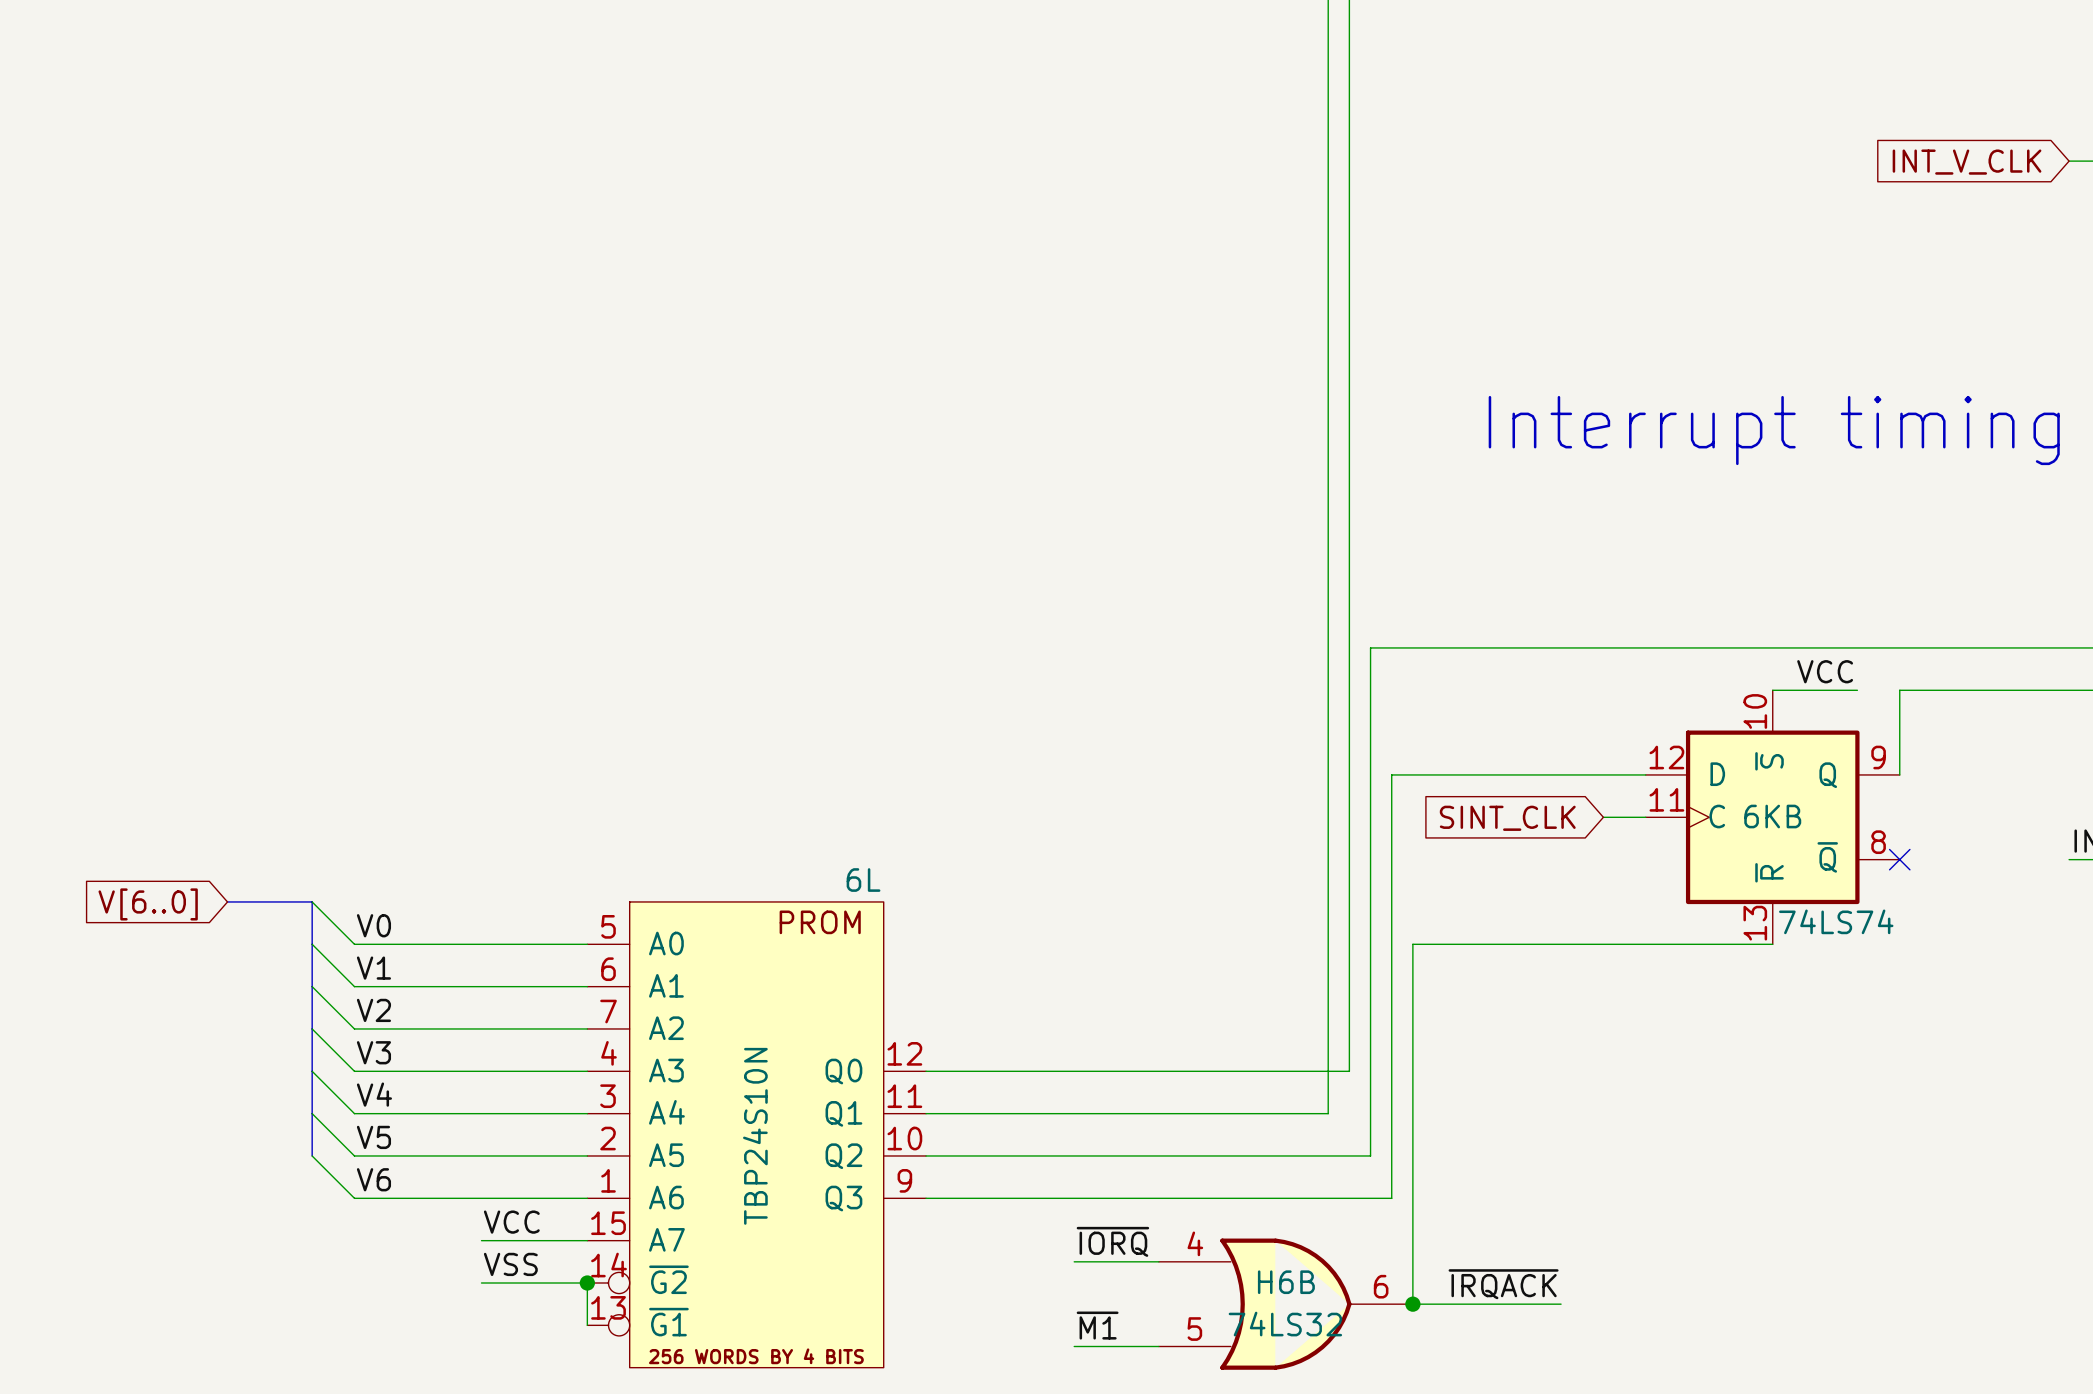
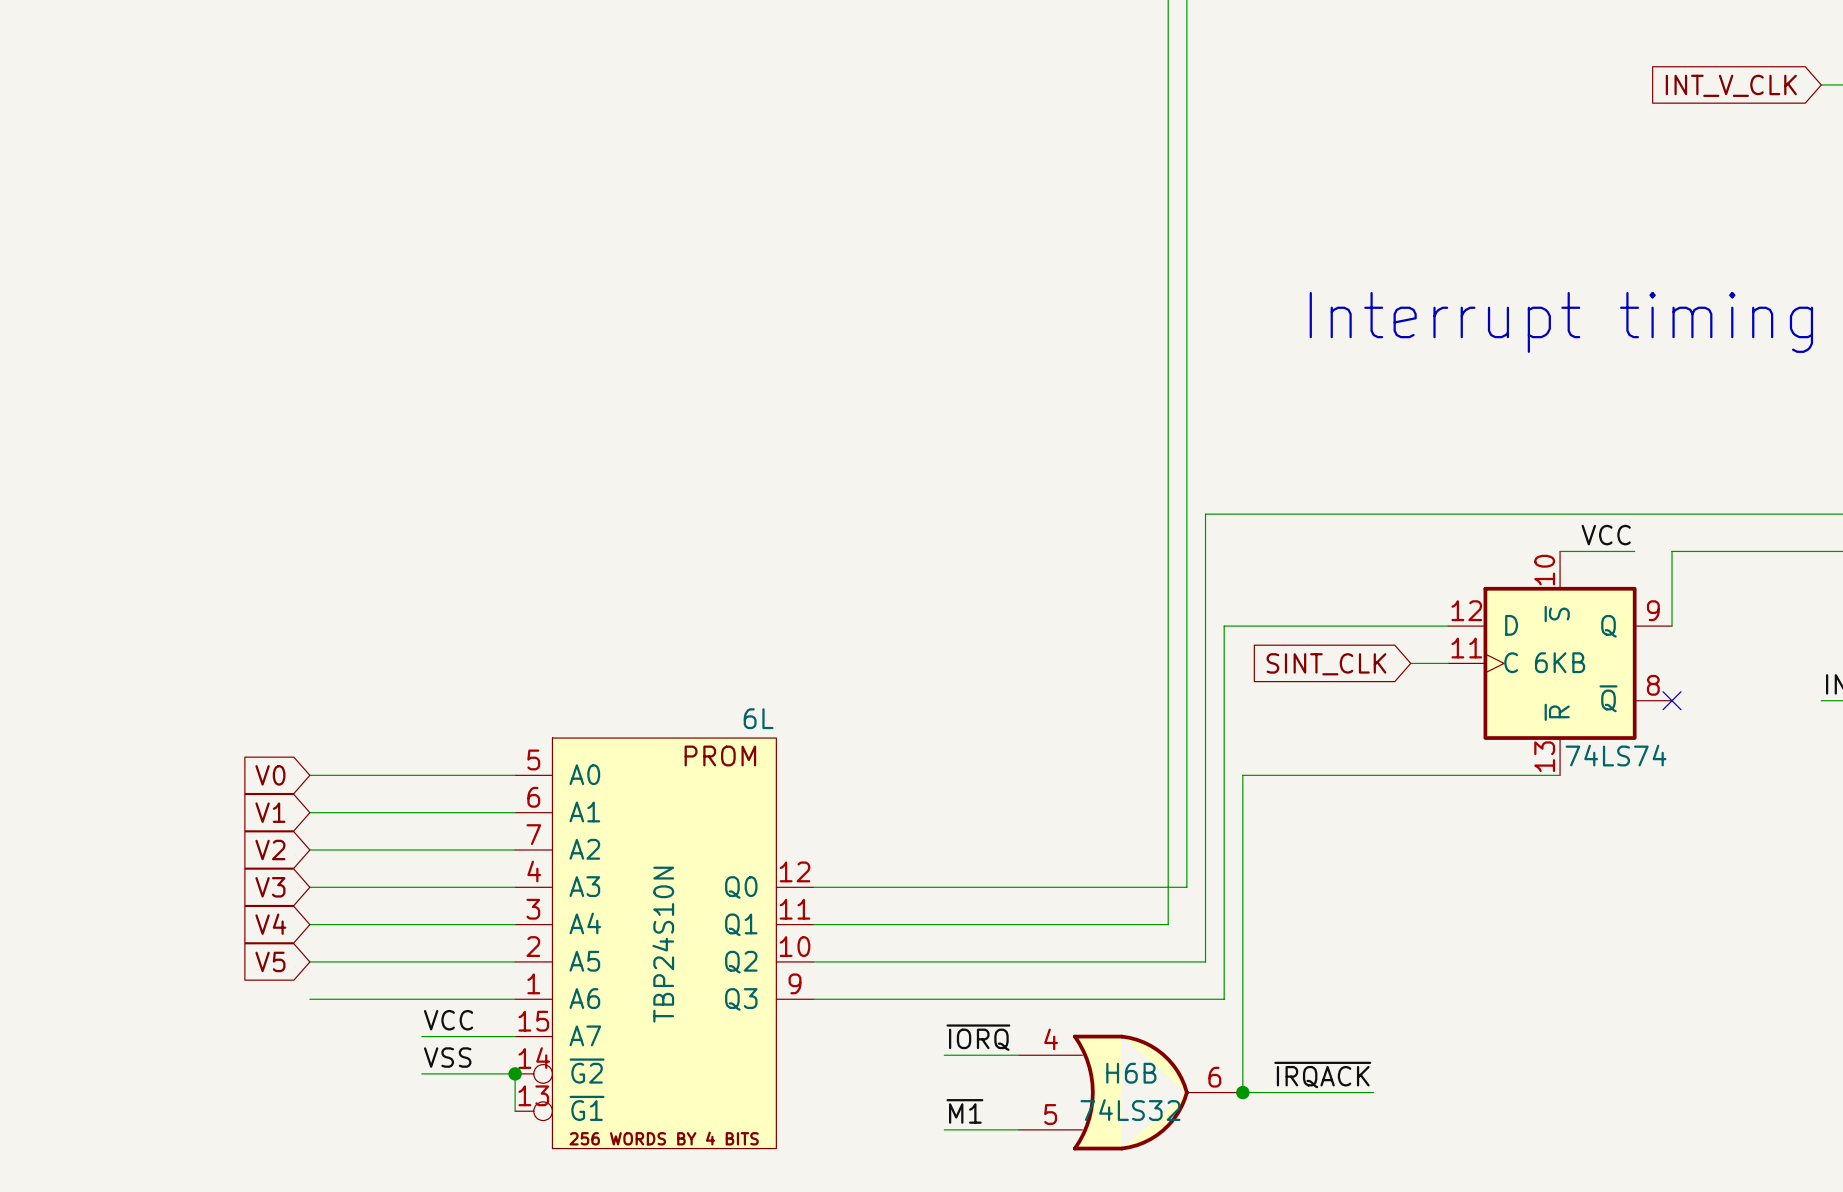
bus: (227, 901) (312, 901) (312, 1155) -> none
wire: (312, 901) (354, 944) -> none
global label: V[6..0] (148, 904) -> none
label: V0 (373, 925) -> none
global label: none -> V0 (270, 775)
wire: (312, 944) (354, 986) -> none
label: V1 (373, 968) -> none
global label: none -> V1 (270, 812)
wire: (312, 986) (354, 1028) -> none
label: V2 (373, 1010) -> none
global label: none -> V2 (270, 849)
wire: (312, 1028) (354, 1071) -> none
label: V3 (373, 1052) -> none
global label: none -> V3 (270, 887)
wire: (312, 1071) (354, 1113) -> none
label: V4 (374, 1094) -> none
global label: none -> V4 (270, 924)
wire: (312, 1113) (354, 1155) -> none
label: V5 (373, 1137) -> none
global label: none -> V5 (270, 961)
wire: (312, 1155) (354, 1198) -> none
label: V6 (373, 1179) -> none

